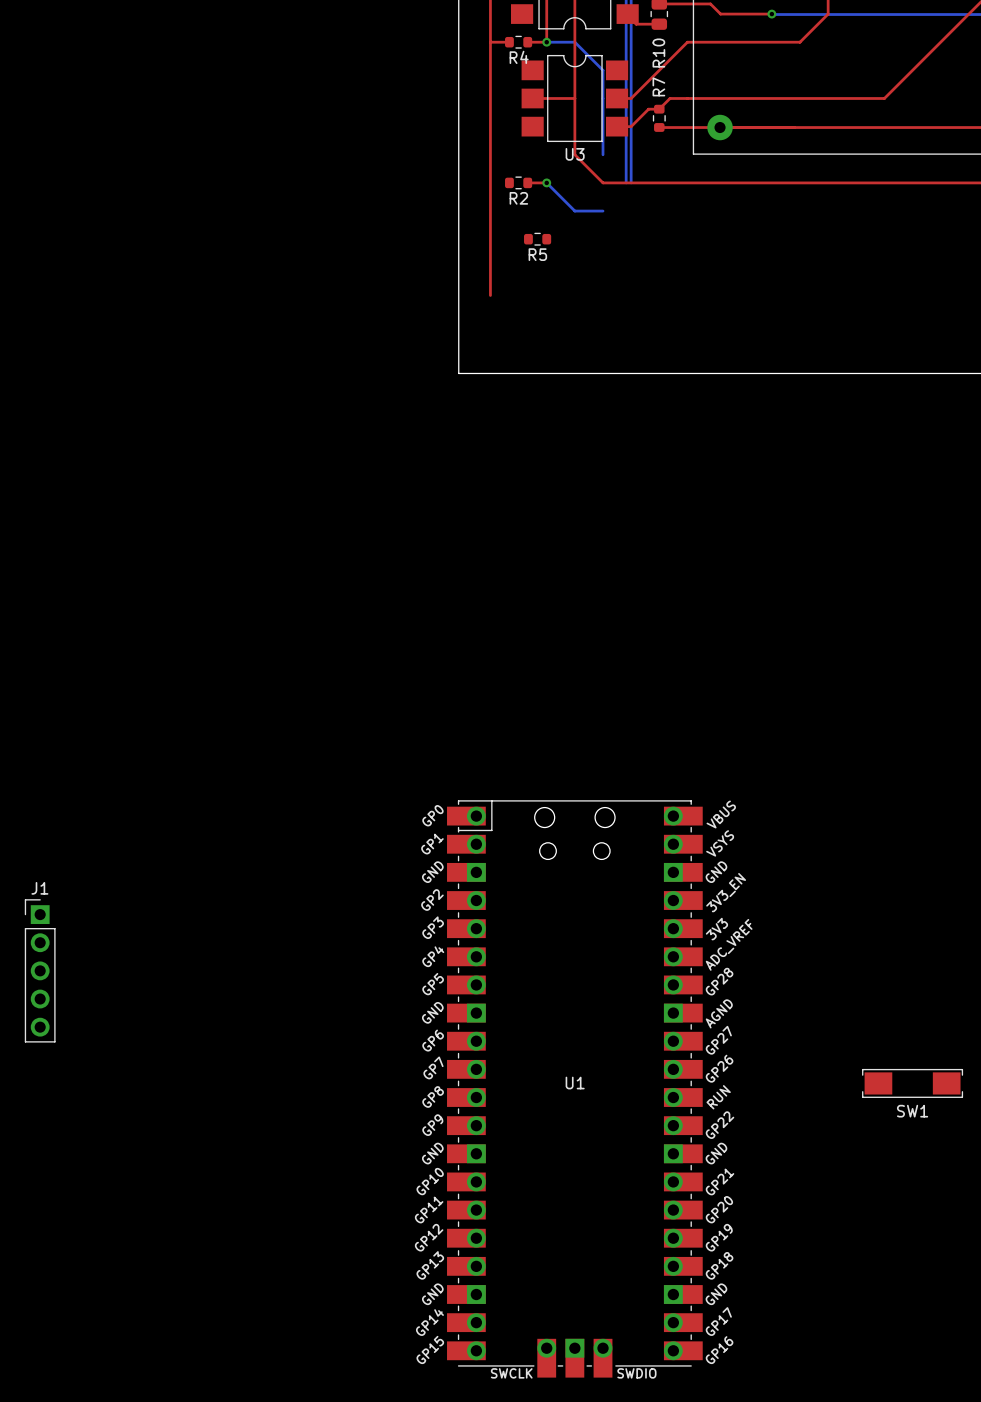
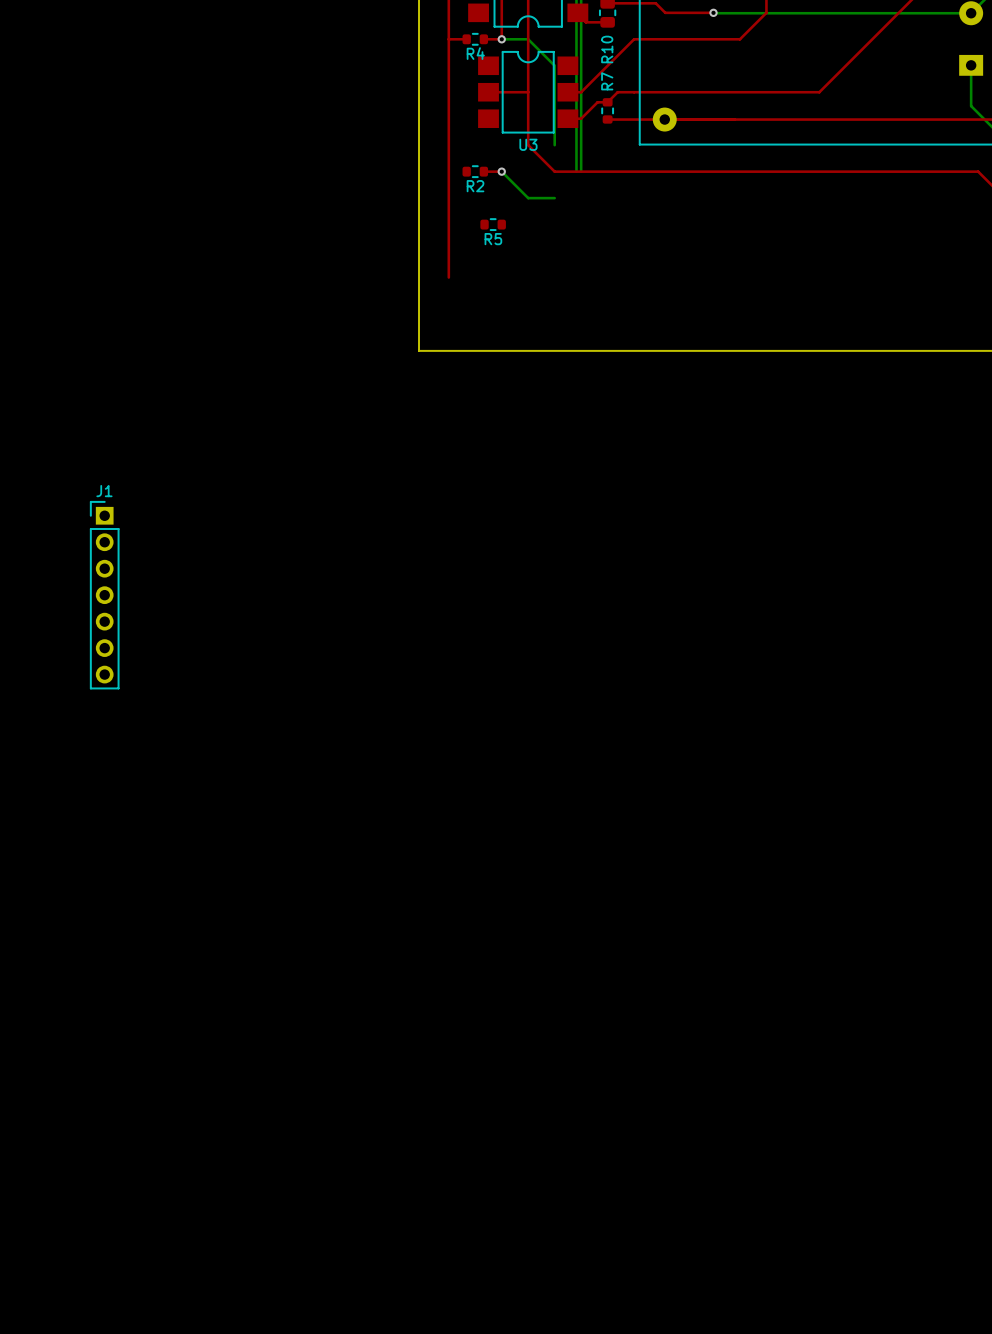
J1 name position: J1 (39, 888) -> J1 (104, 491)
J1 footprint: [24, 899, 56, 1043] -> [90, 501, 120, 690]
SW1: (912, 1083) -> none
U1: (574, 1088) -> none

